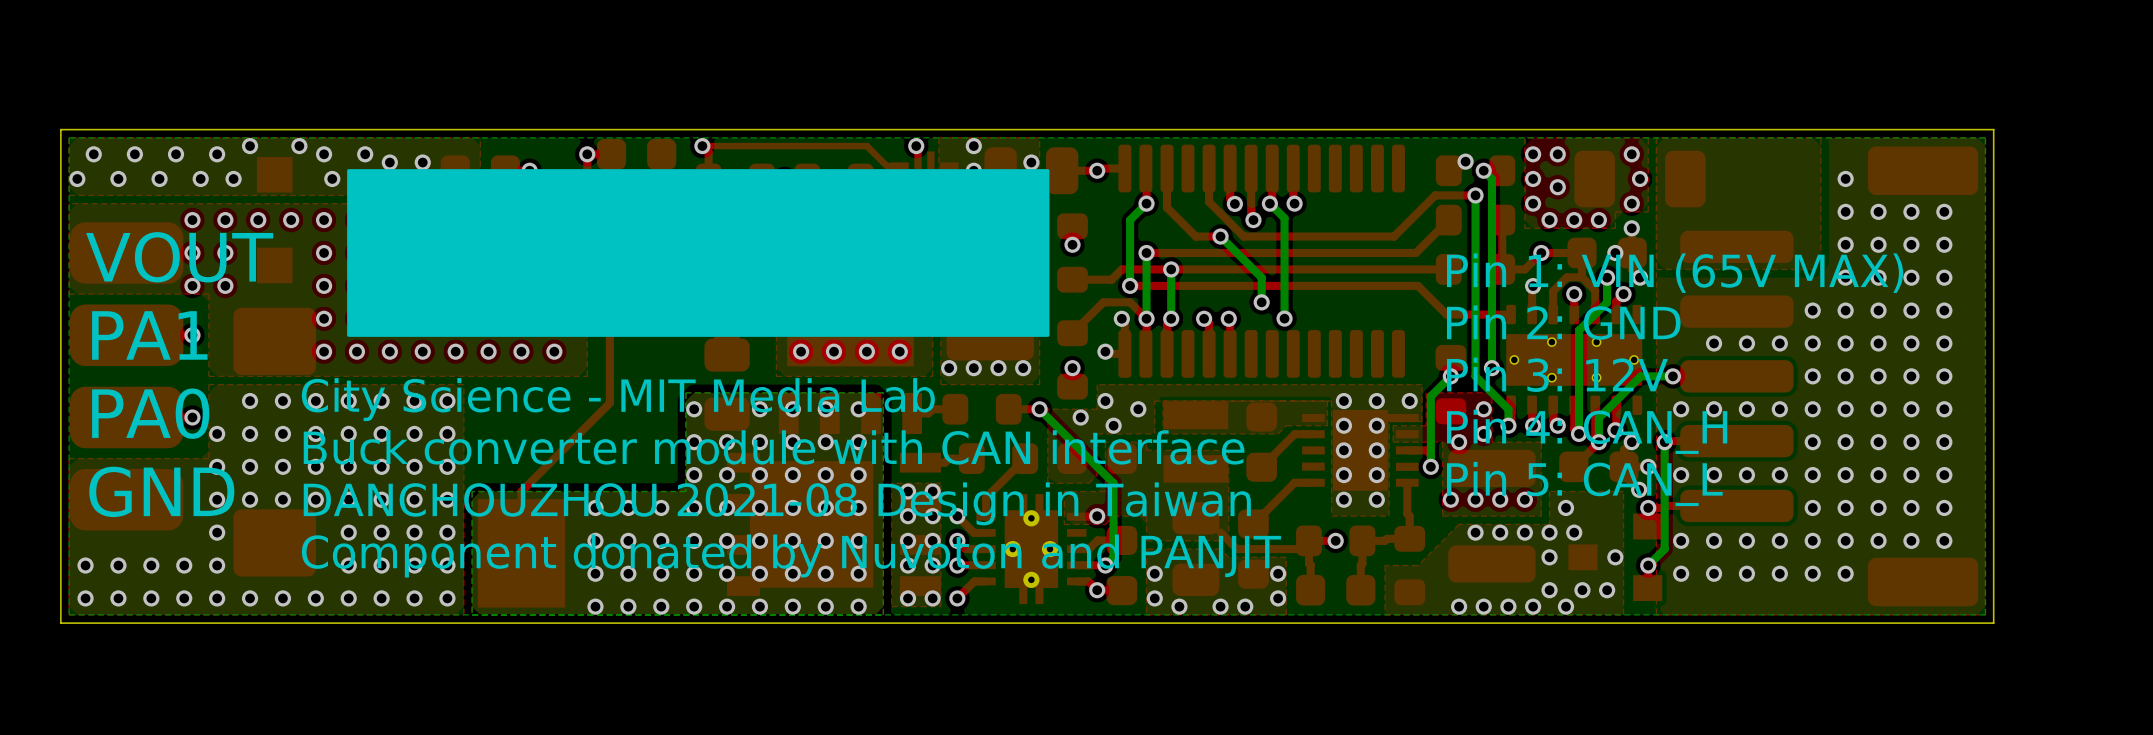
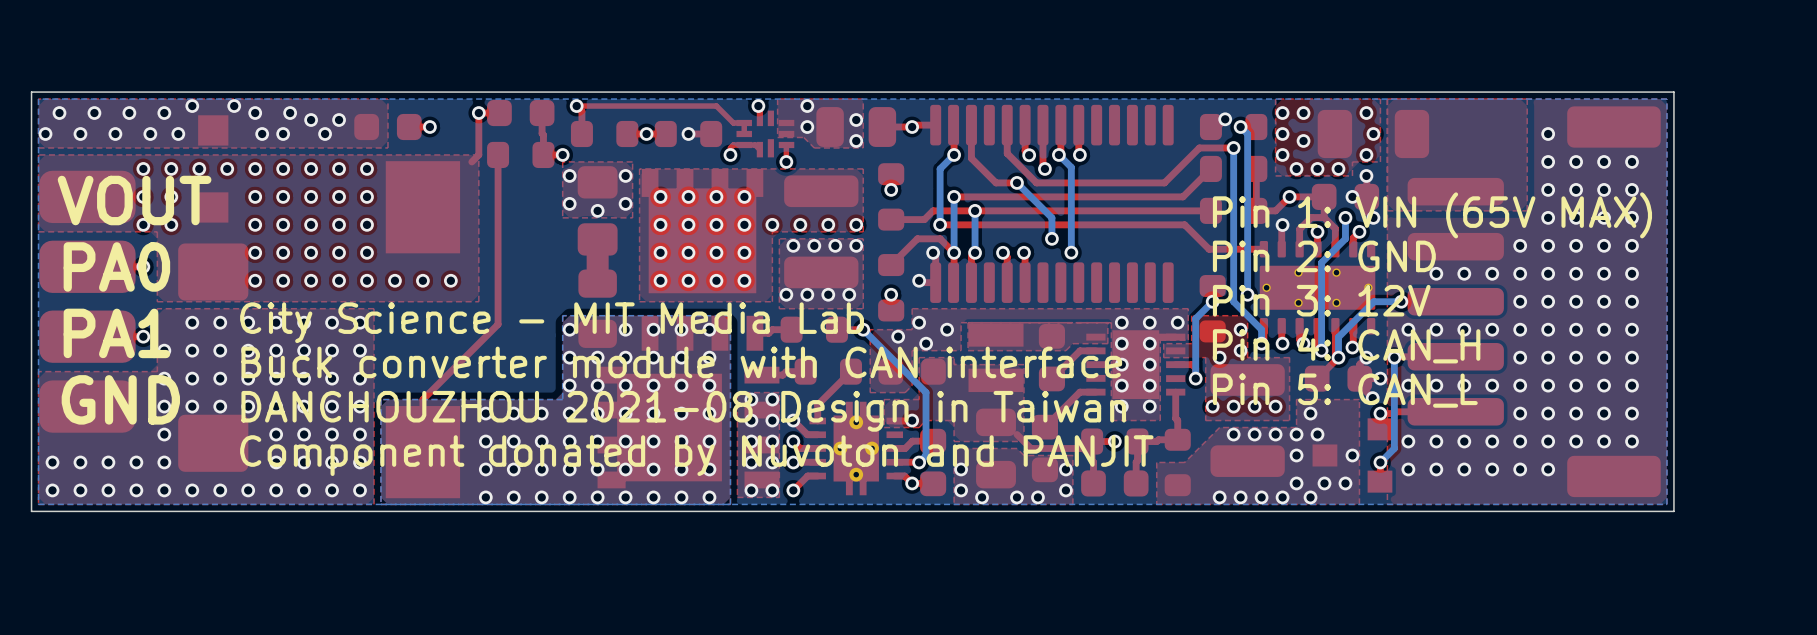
drawing: [347, 169, 1050, 337] -> none
text: PA1 (149, 335) -> PA0 (116, 266)
text: PA0 (150, 413) -> PA1 (116, 333)

